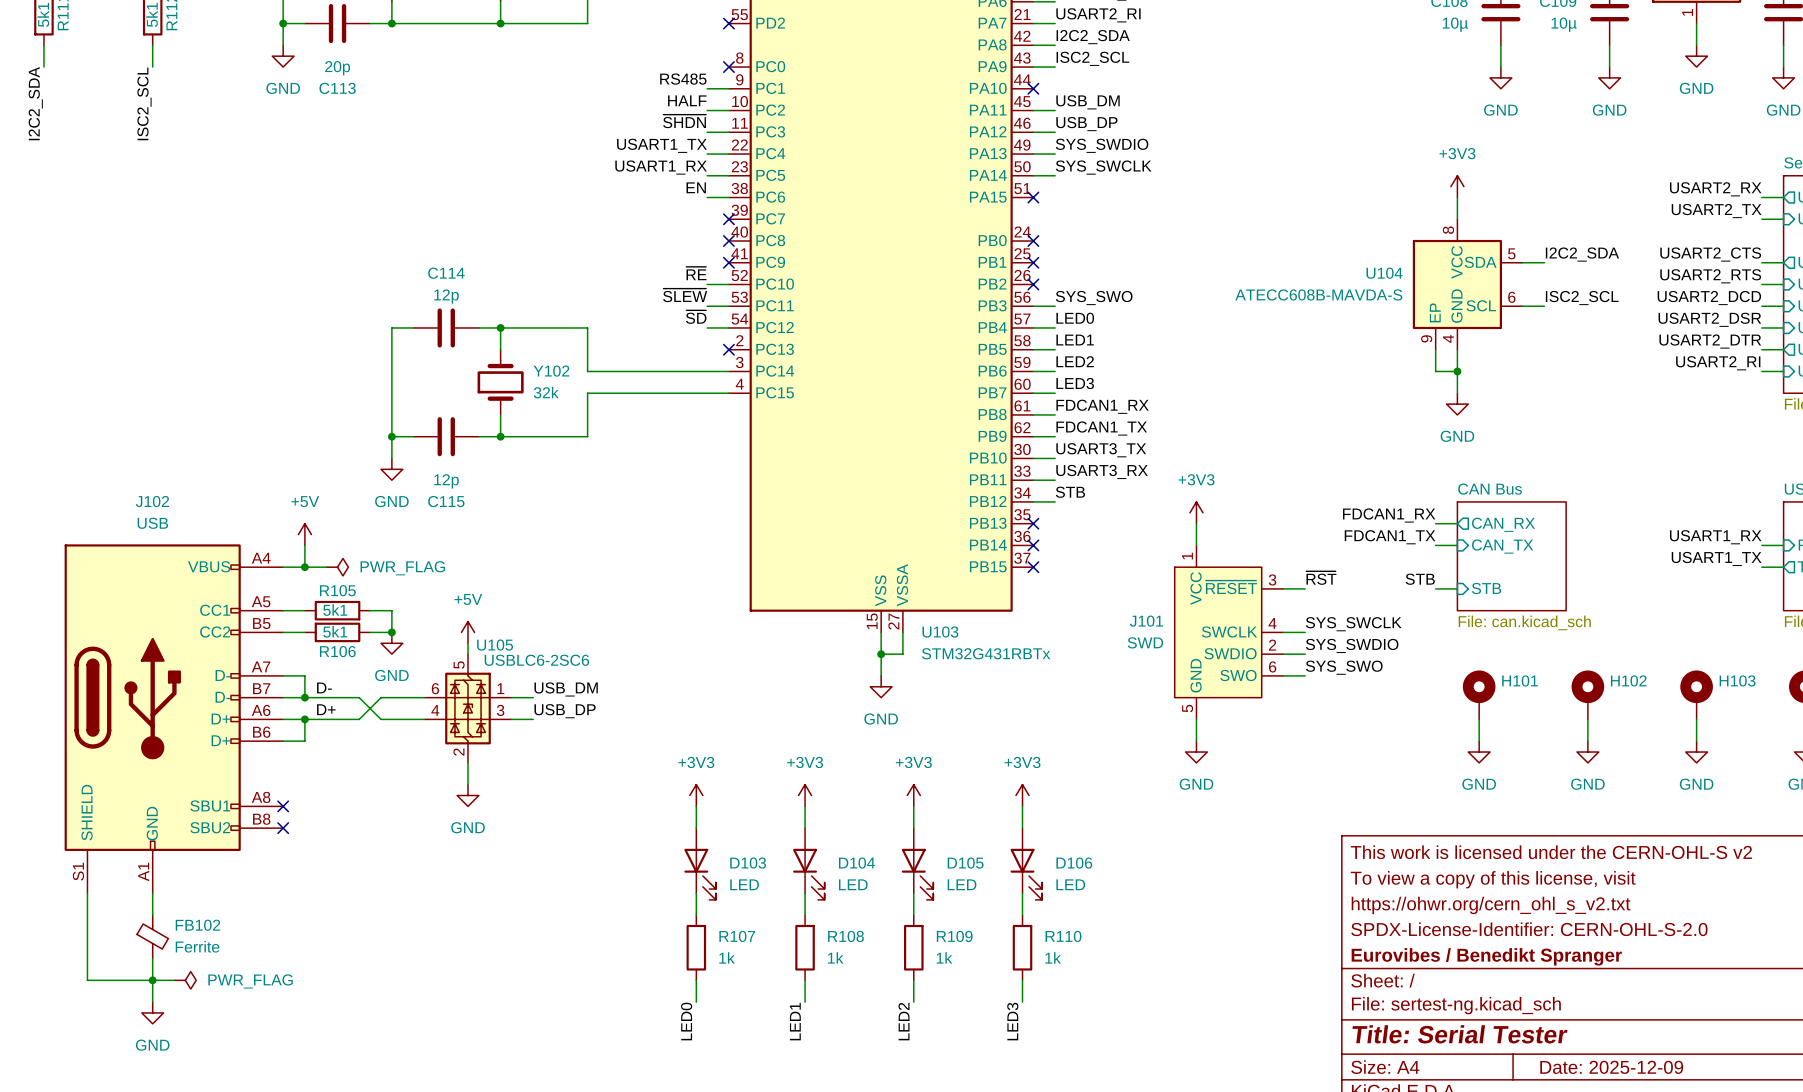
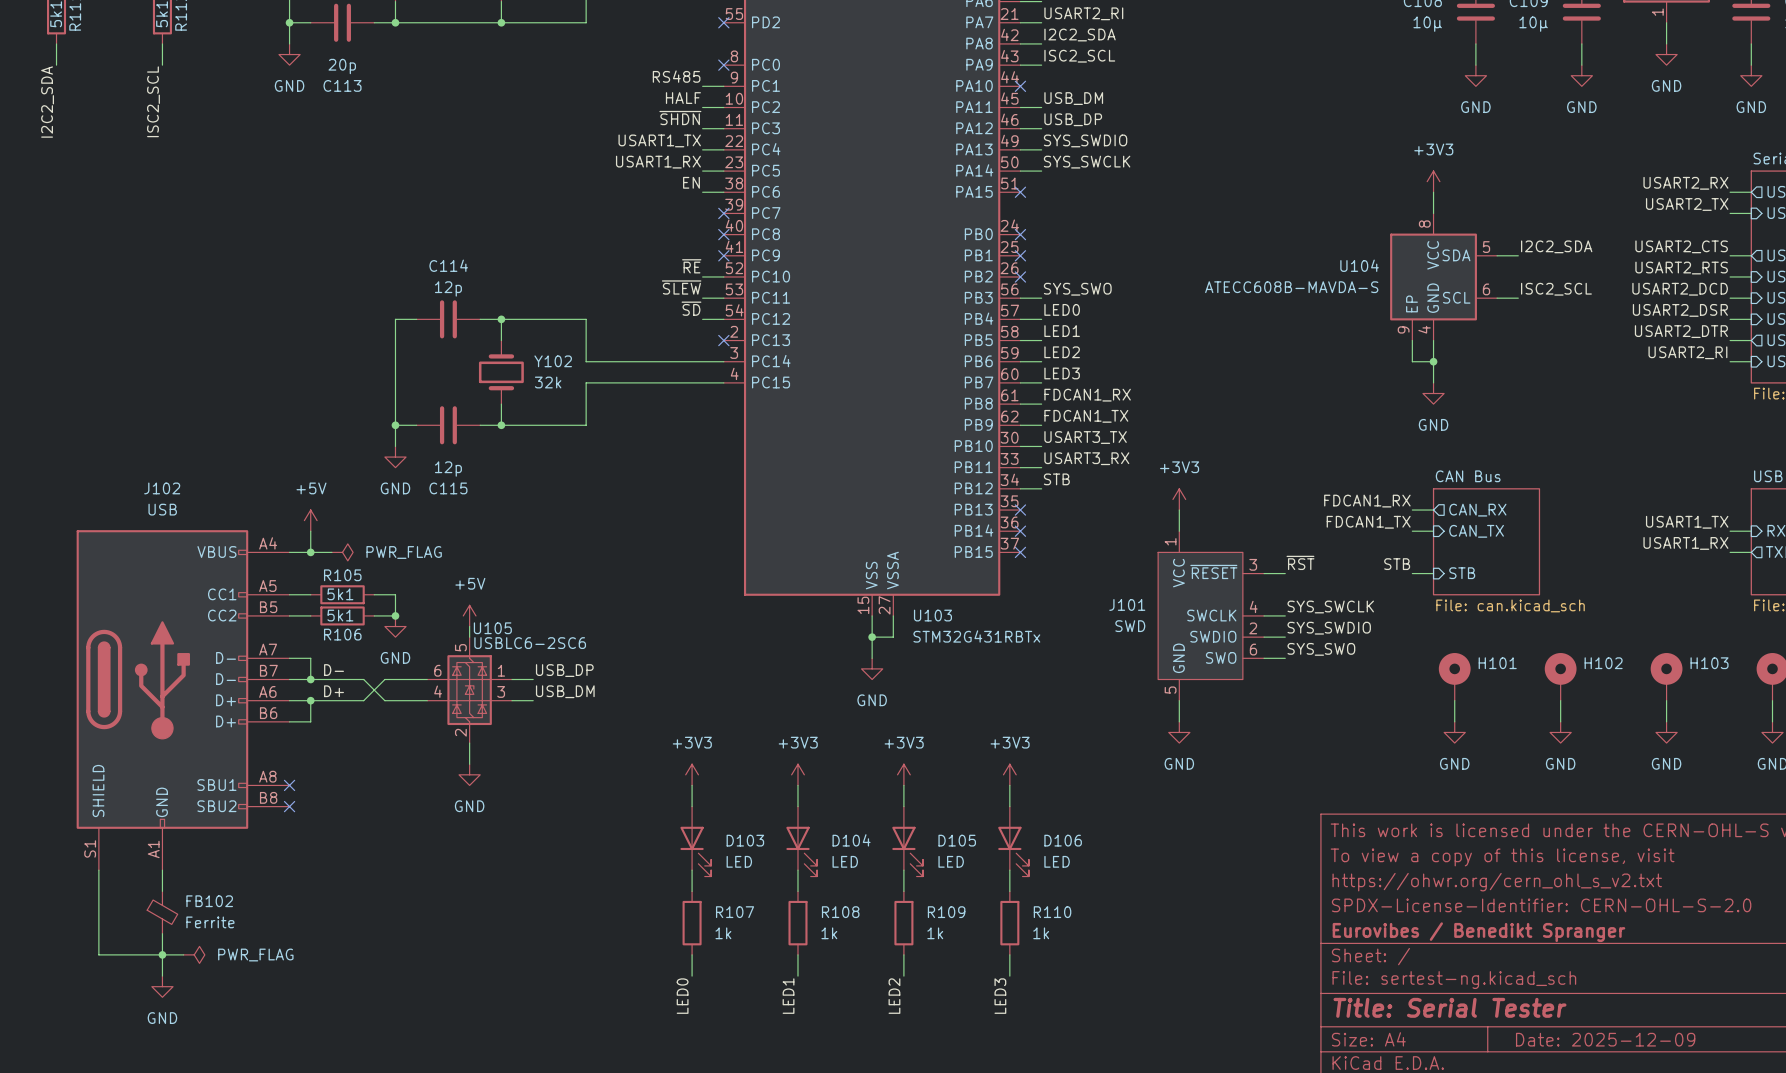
label: USART1_RX (1715, 537) -> USART1_TX (1687, 522)
label: USART1_TX (1716, 558) -> USART1_RX (1685, 543)
label: USB_DM (566, 689) -> USB_DP (564, 670)
label: USB_DP (565, 711) -> USB_DM (565, 691)

